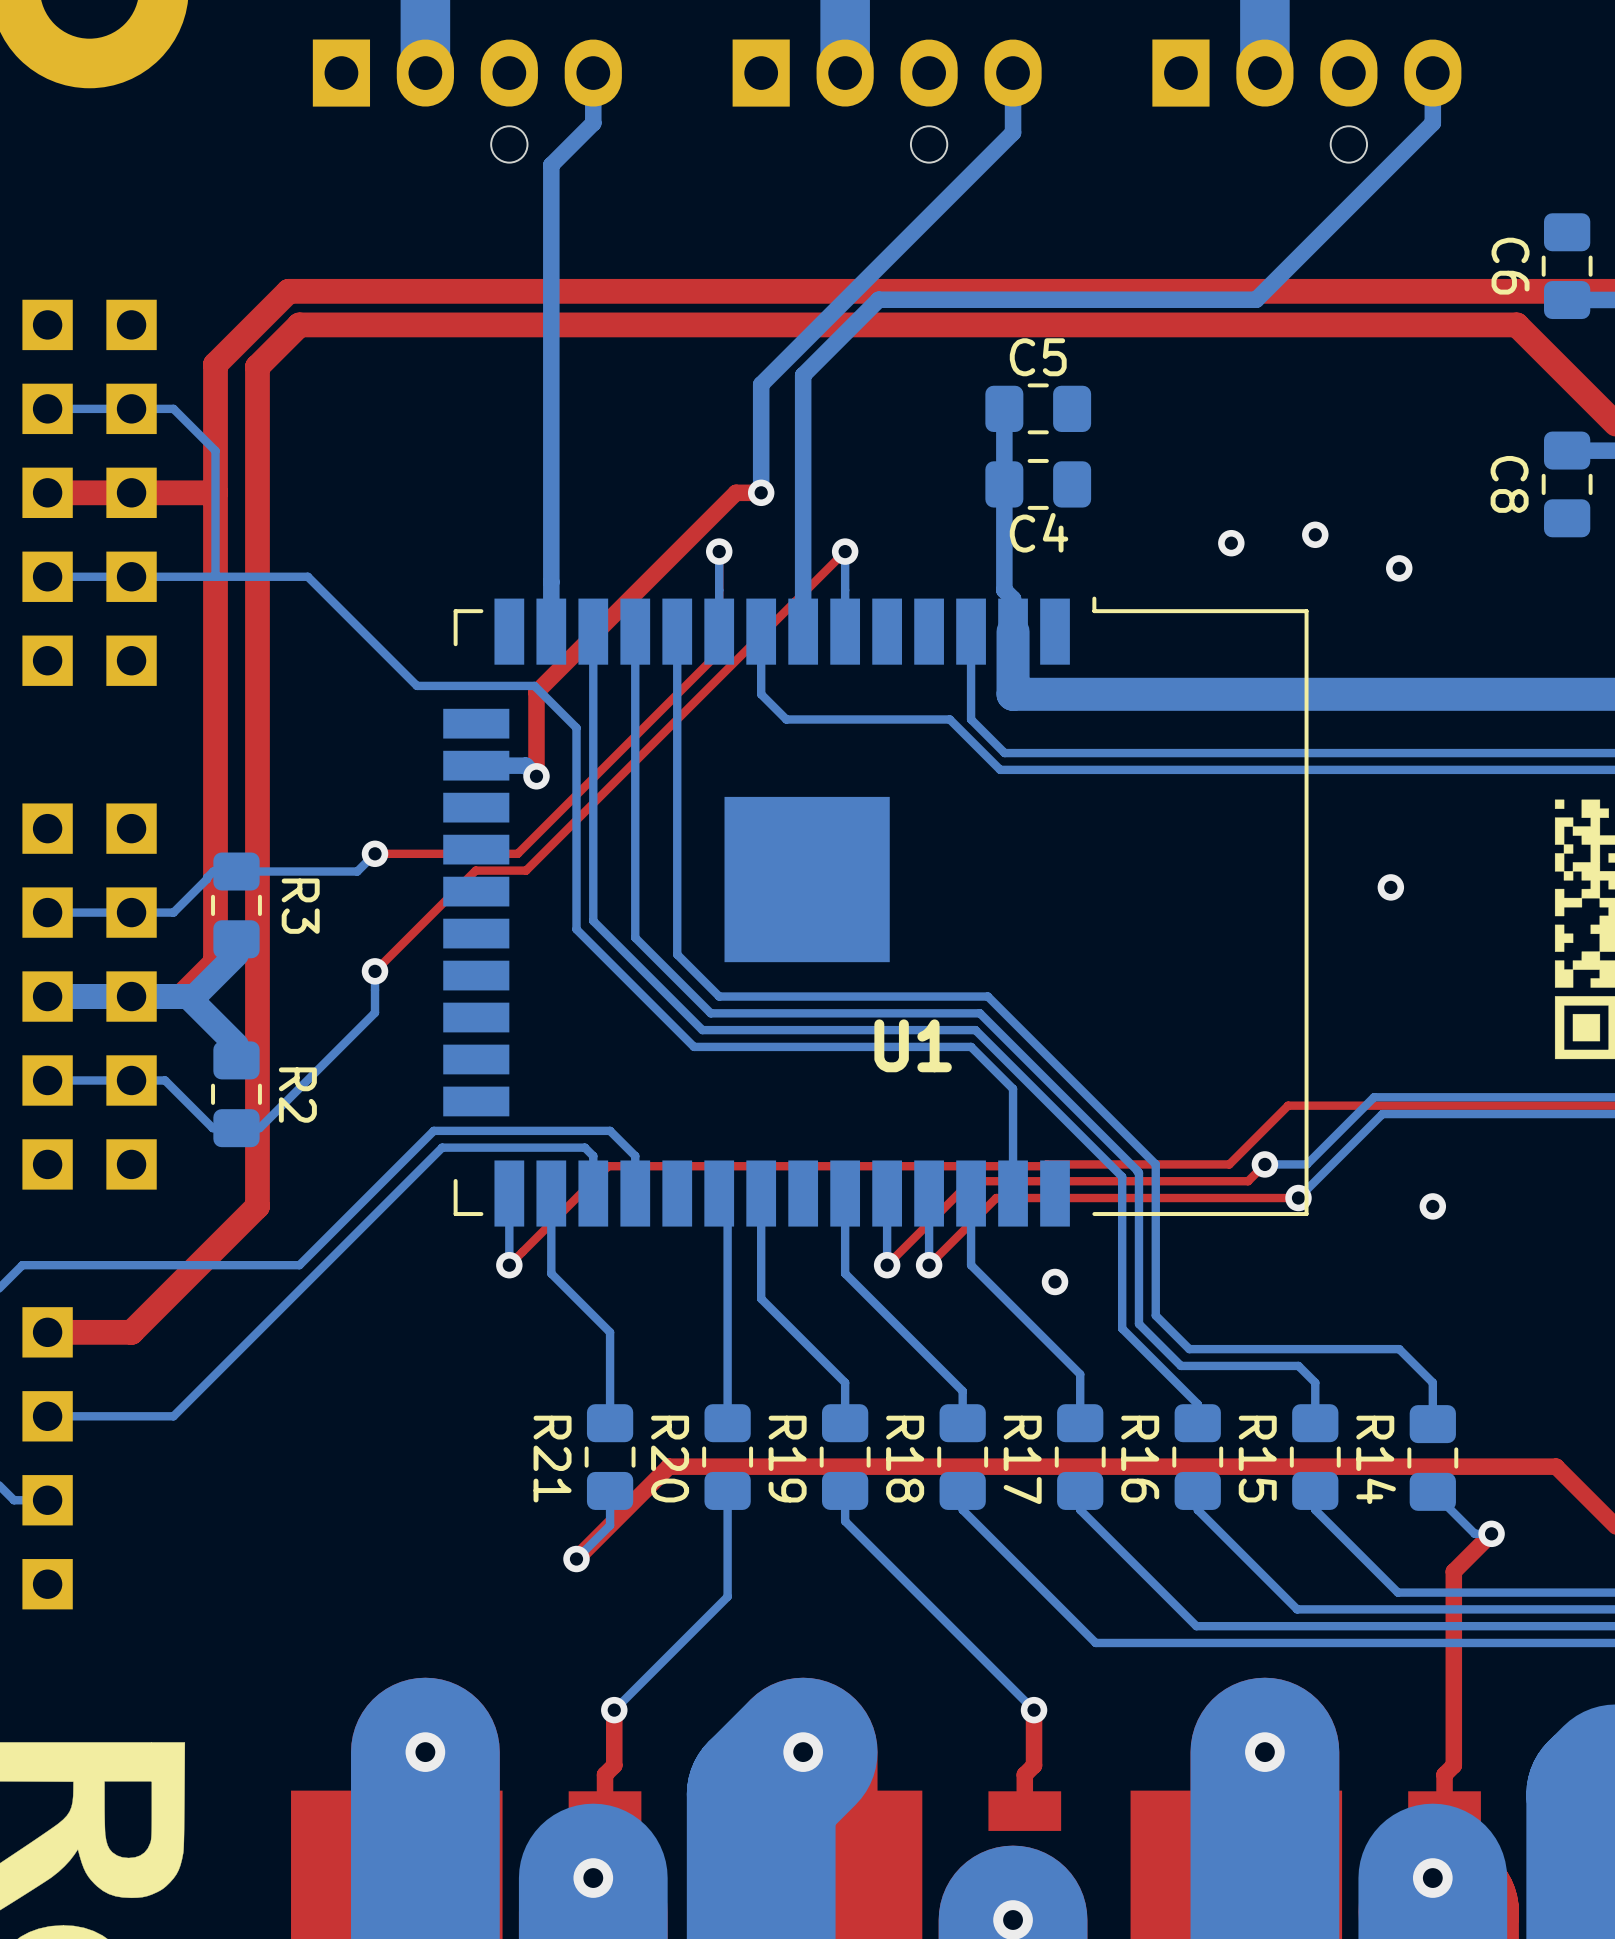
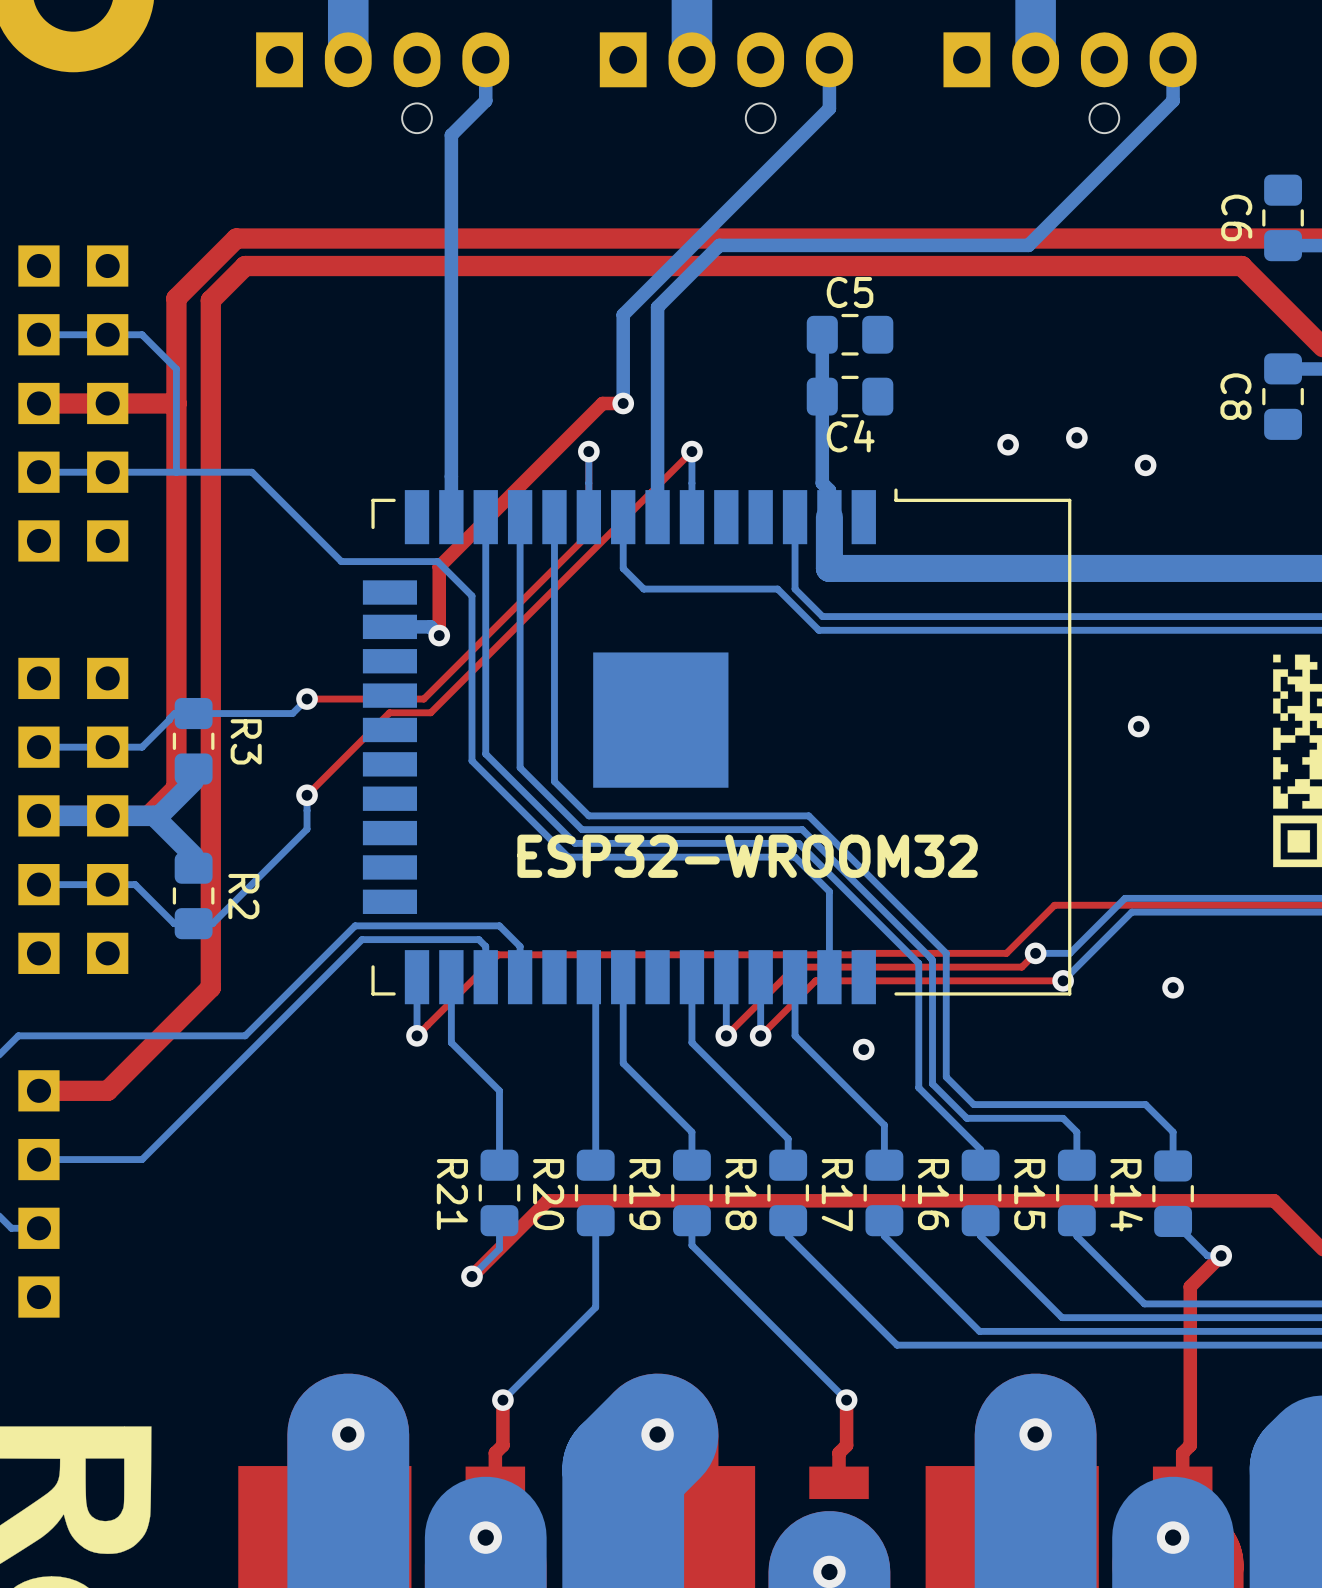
U1 name: U1 (913, 1045) -> ESP32-WROOM32 (747, 856)

